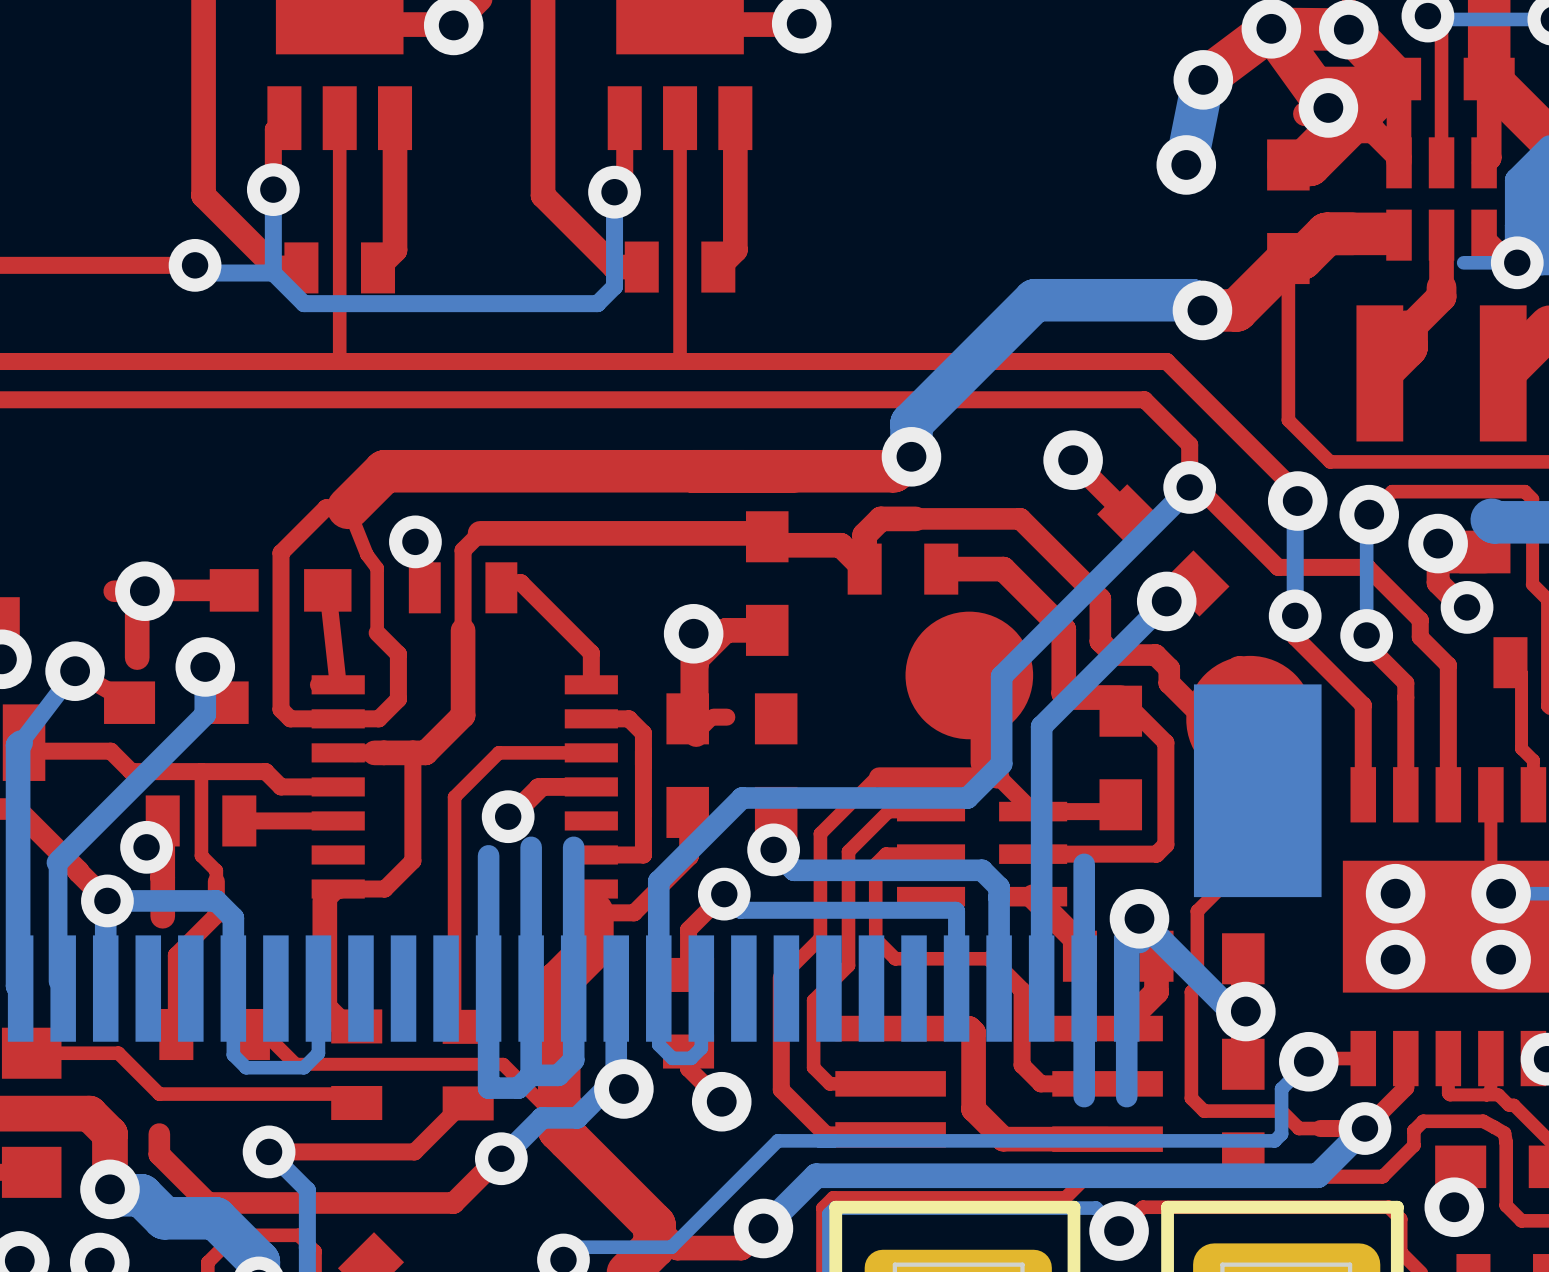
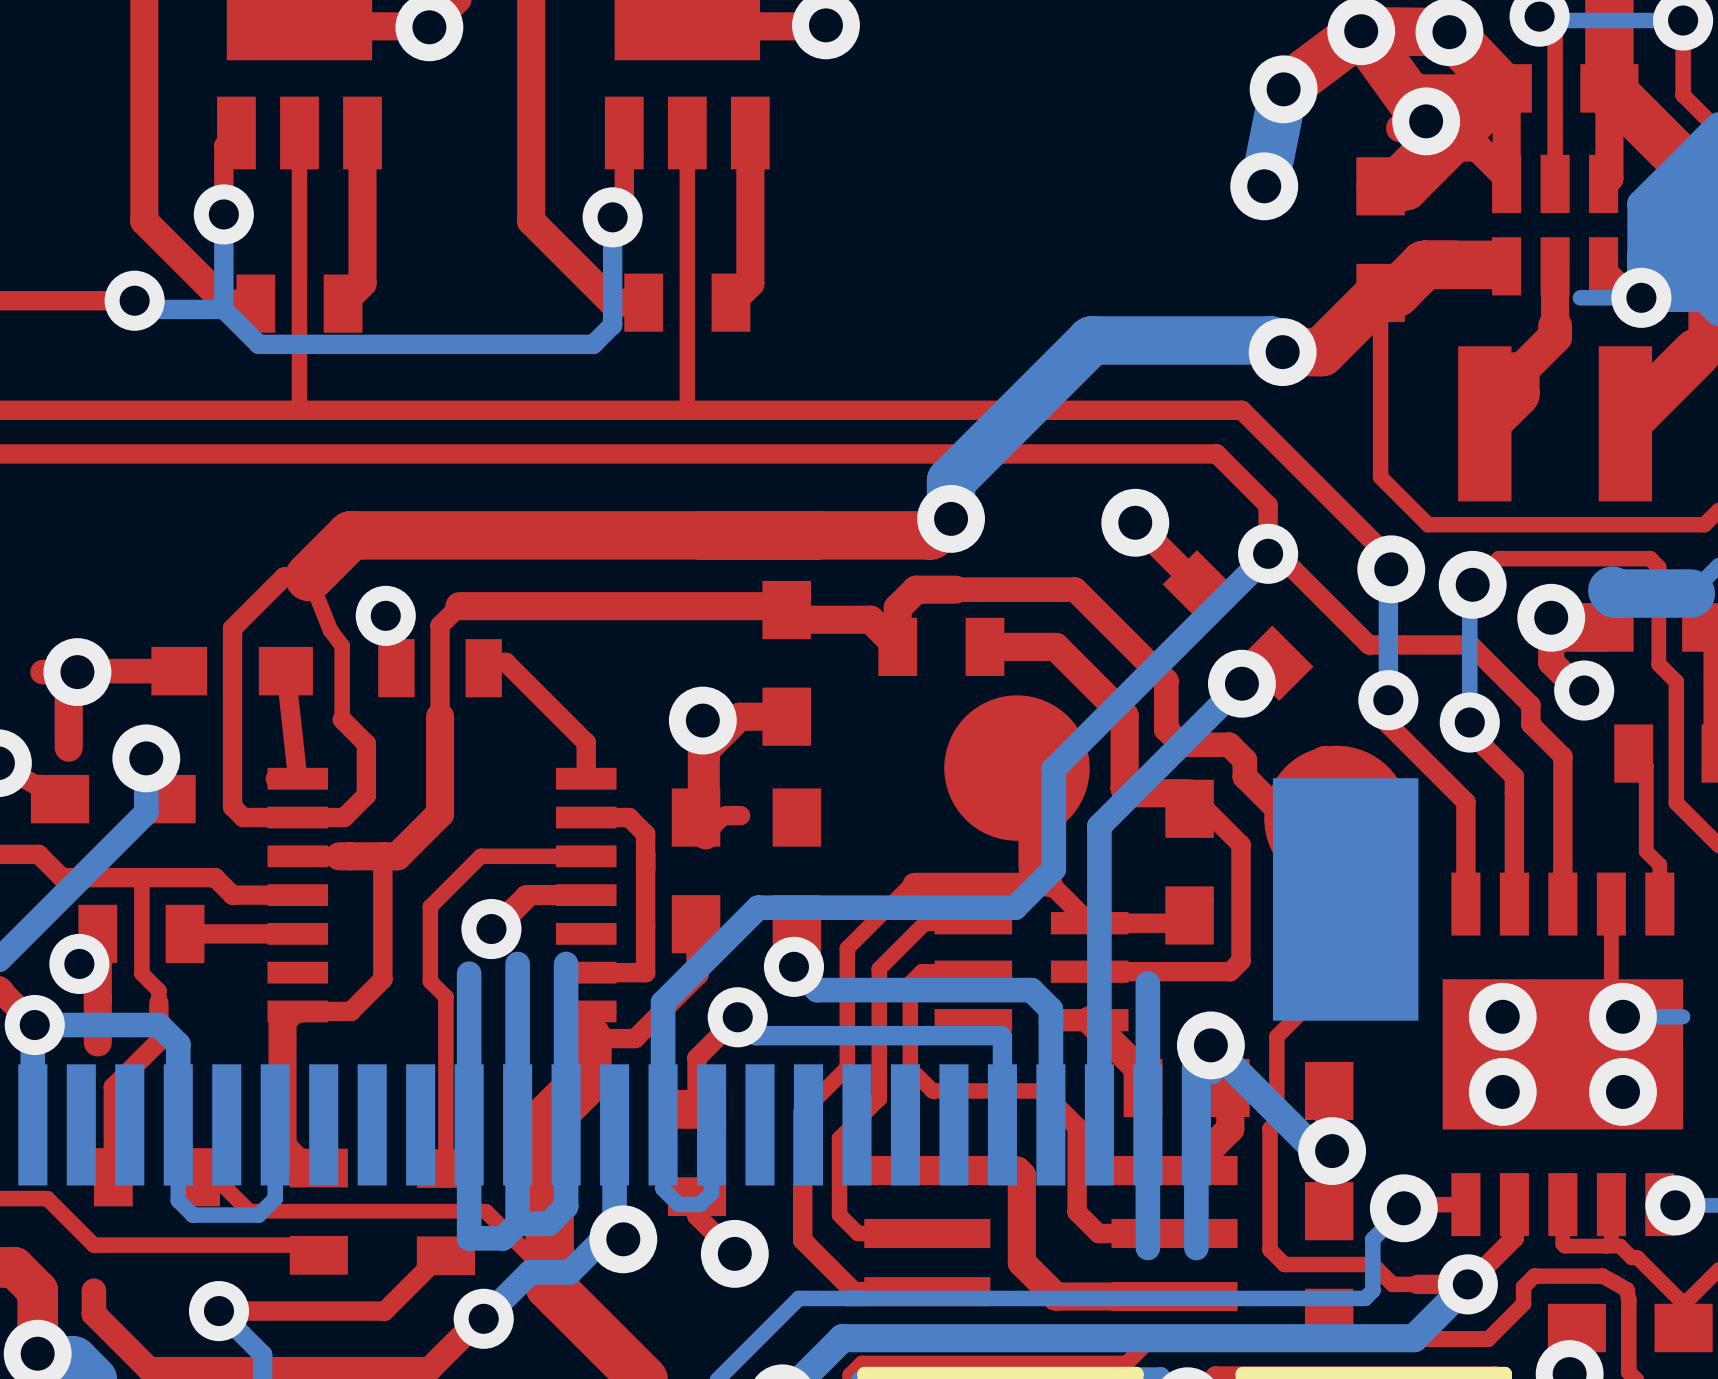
top track: (454, 862) (454, 1013) (468, 1026) -> (430, 981) (445, 996) (445, 1168)

